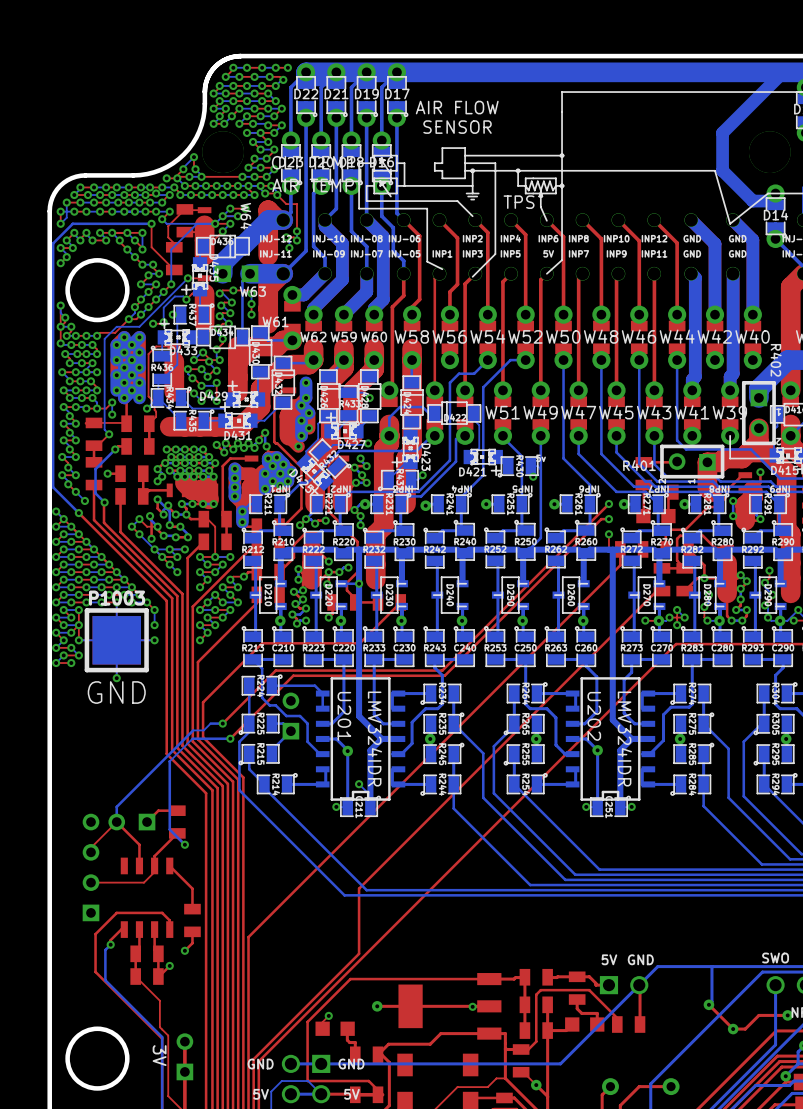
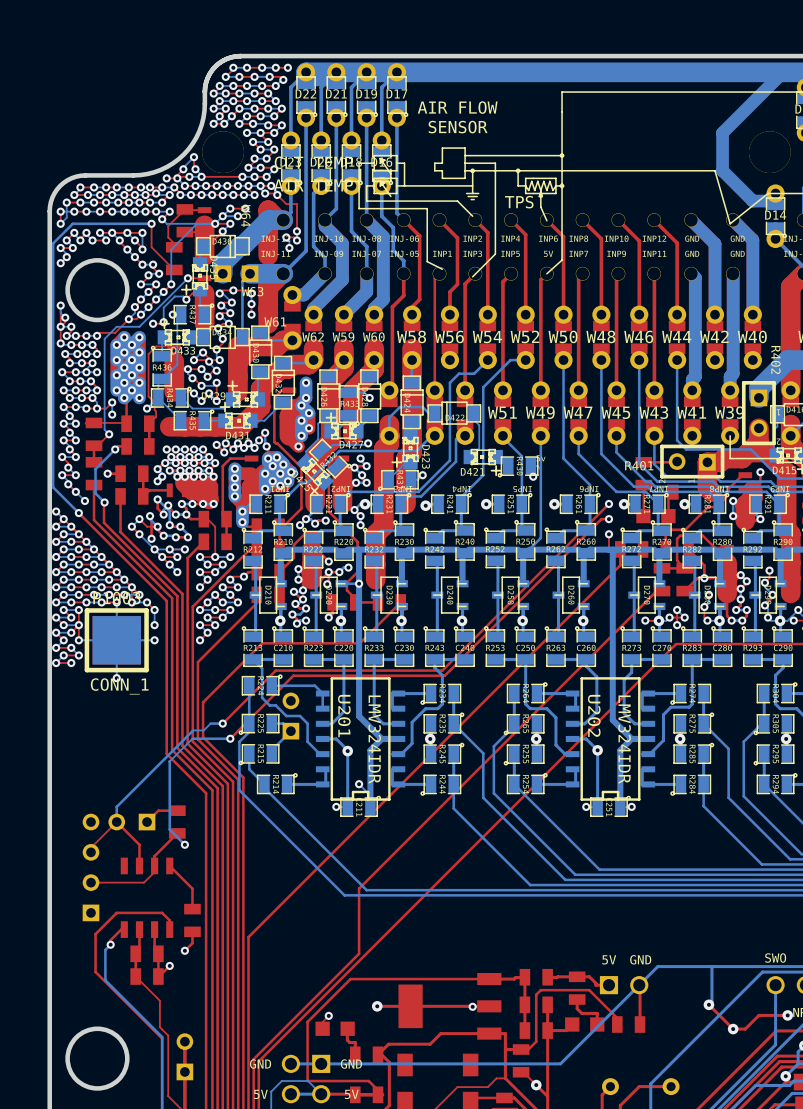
P1003 value: none -> CONN_1 (119, 686)
text: GND (116, 692) -> none
text: 3V (159, 1055) -> none

